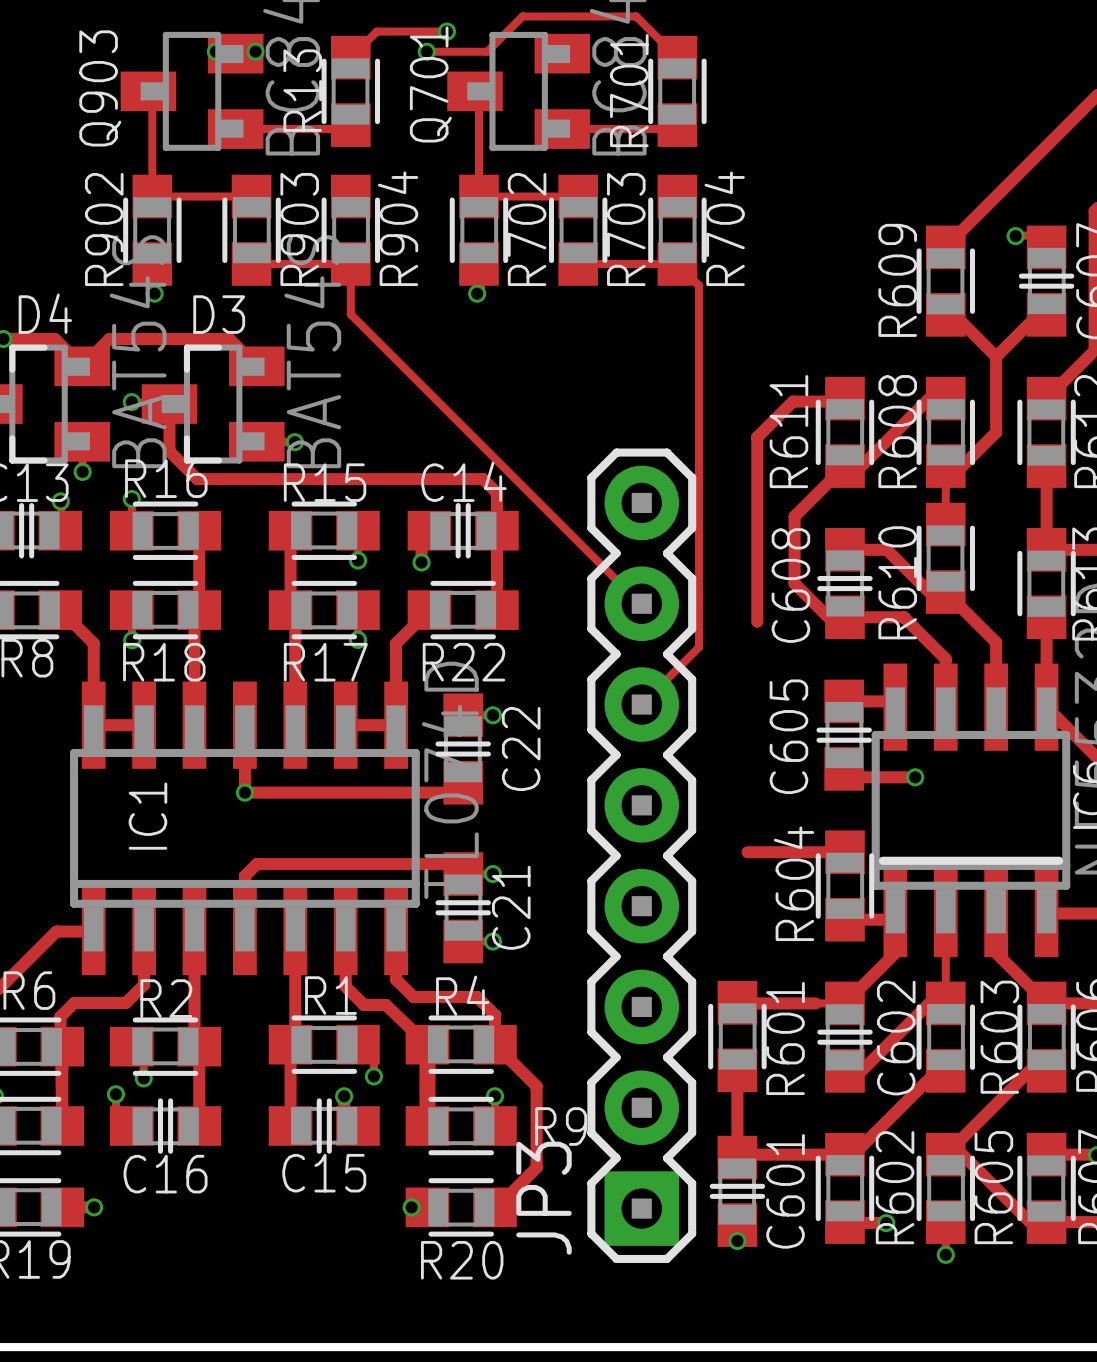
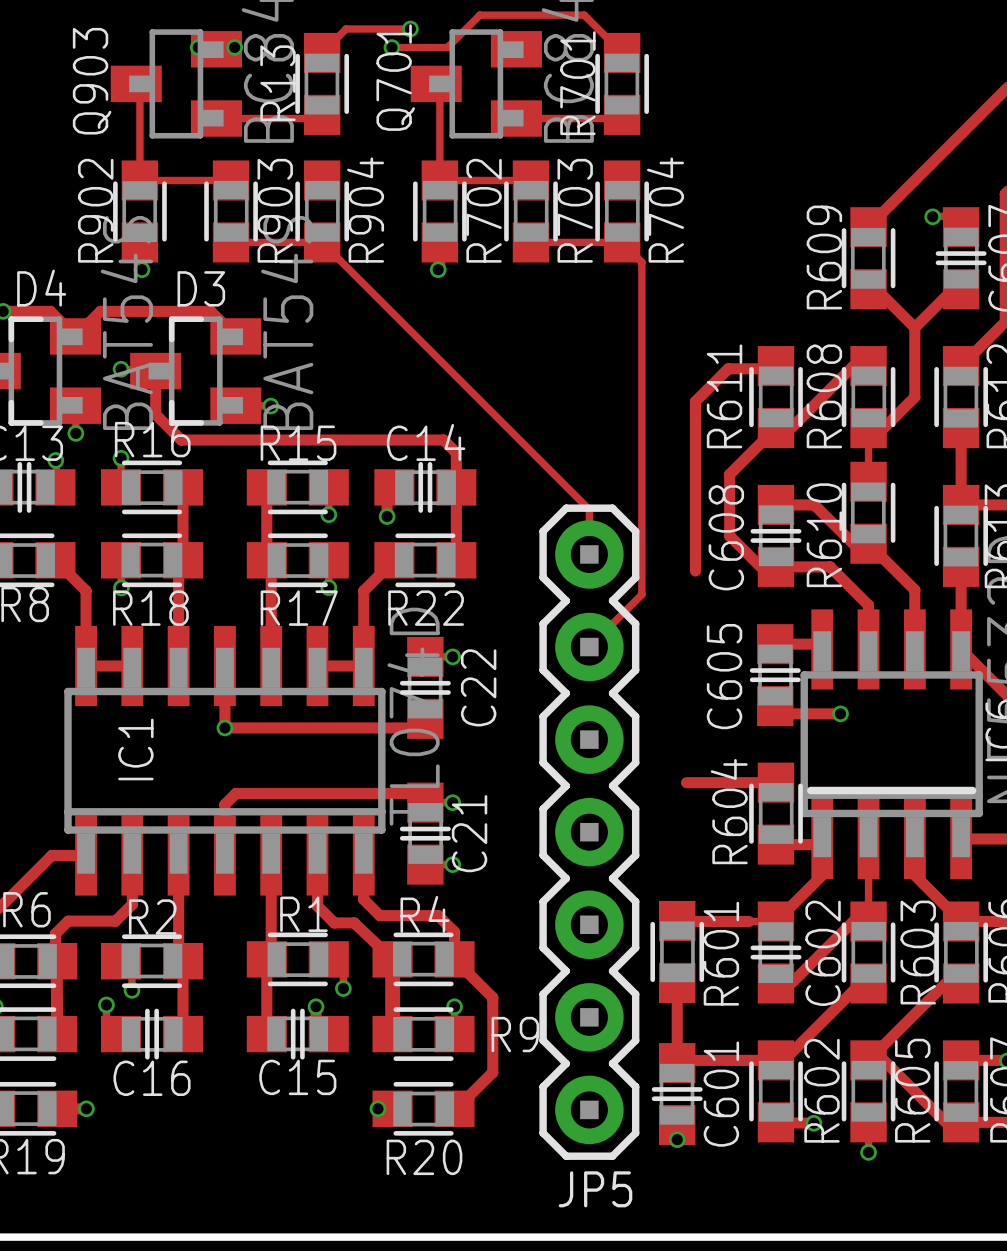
top track: (350, 264) (350, 314) (641, 603) -> (322, 242) (589, 509) (589, 554)
JP3: (641, 855) -> none
JP5: none -> (589, 832)

